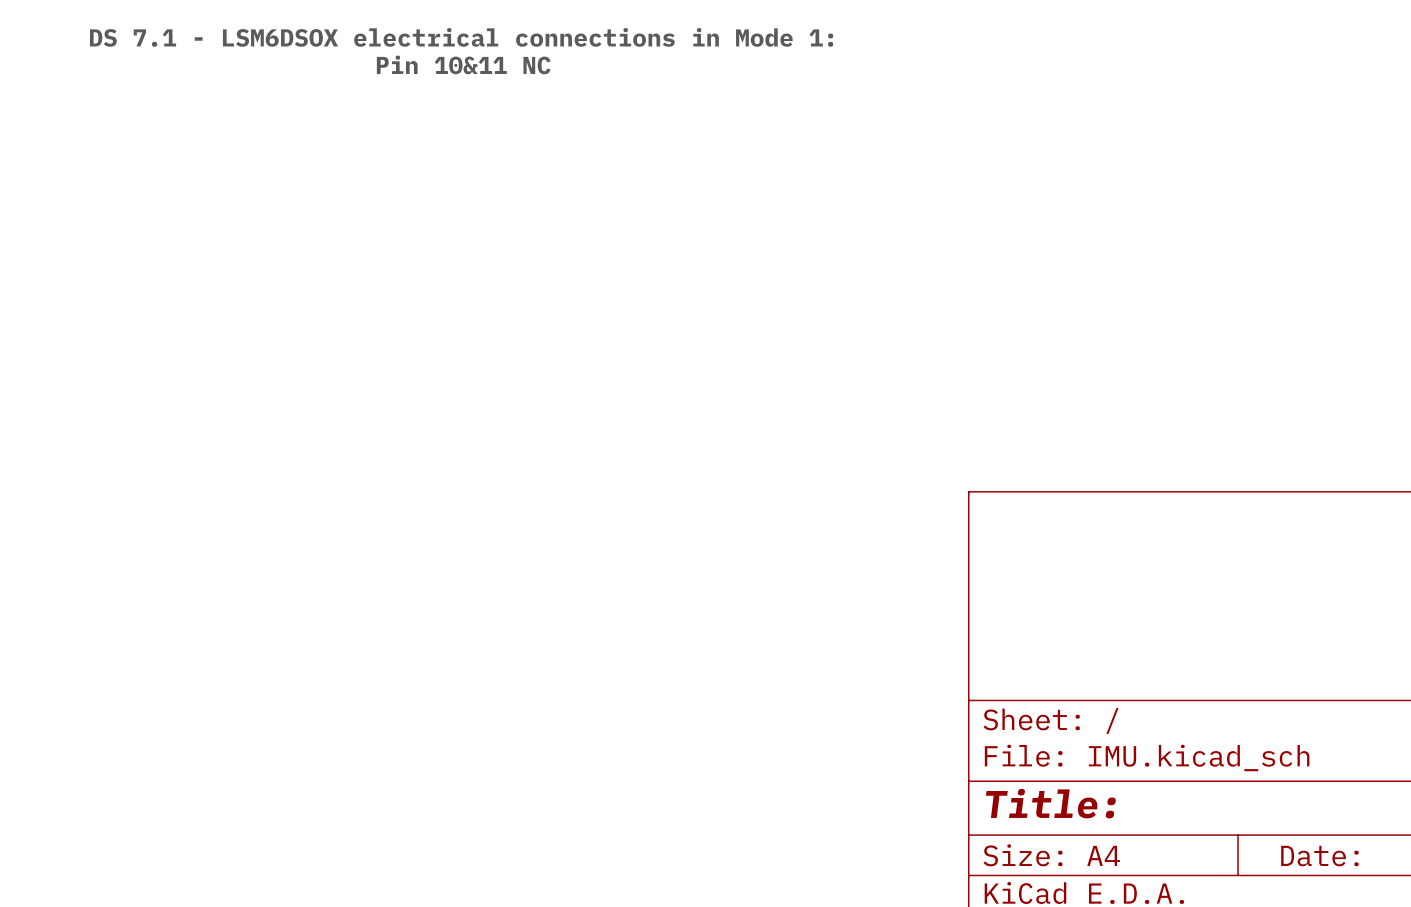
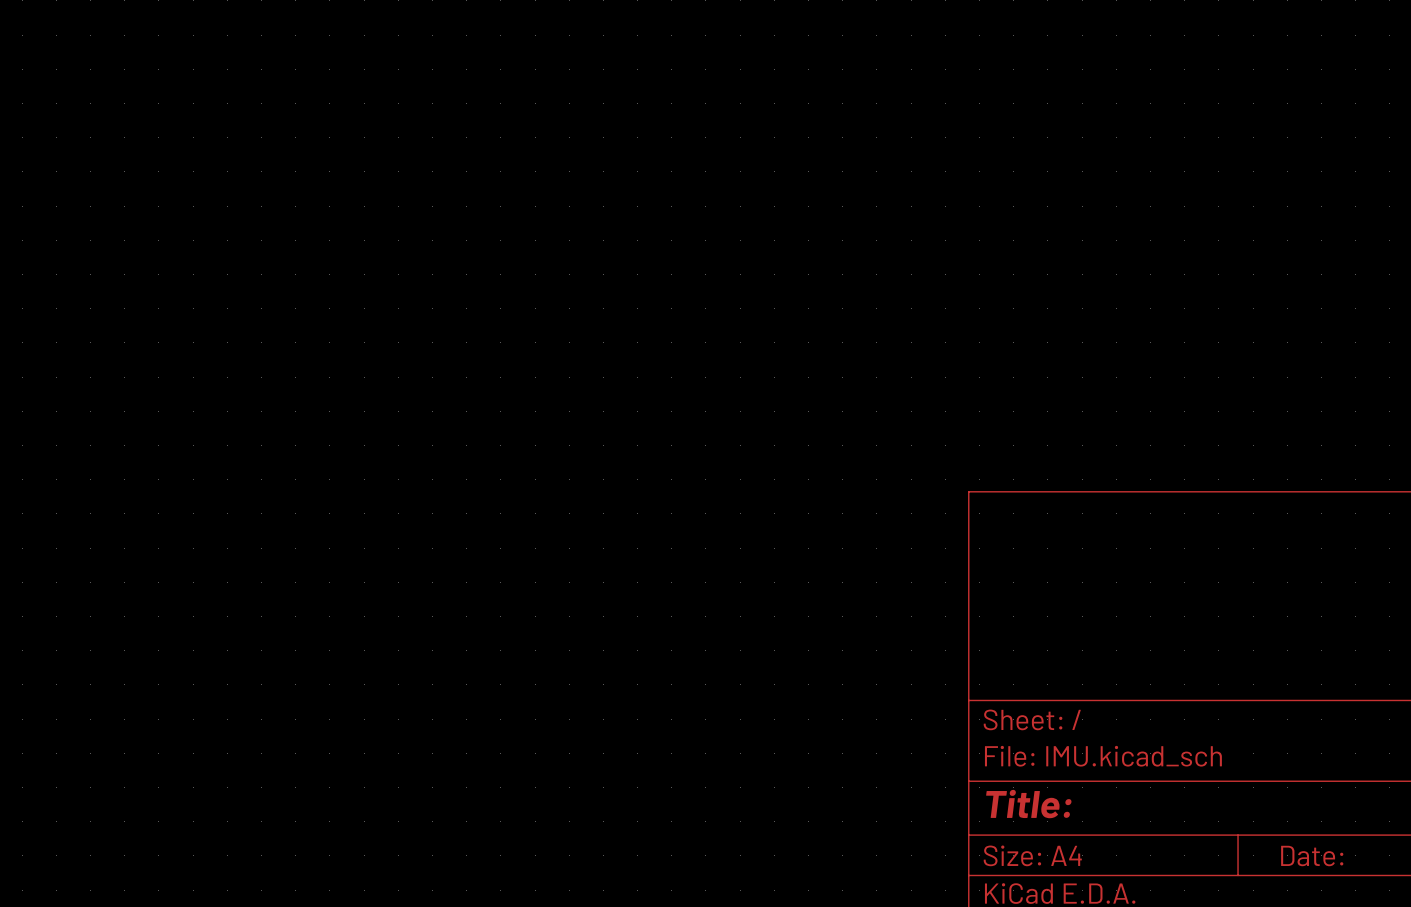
text: DS 7.1 - LSM6DSOX electrical connections in Mode 1: (461, 37) -> none
text: Pin 10&11 NC (463, 64) -> none

